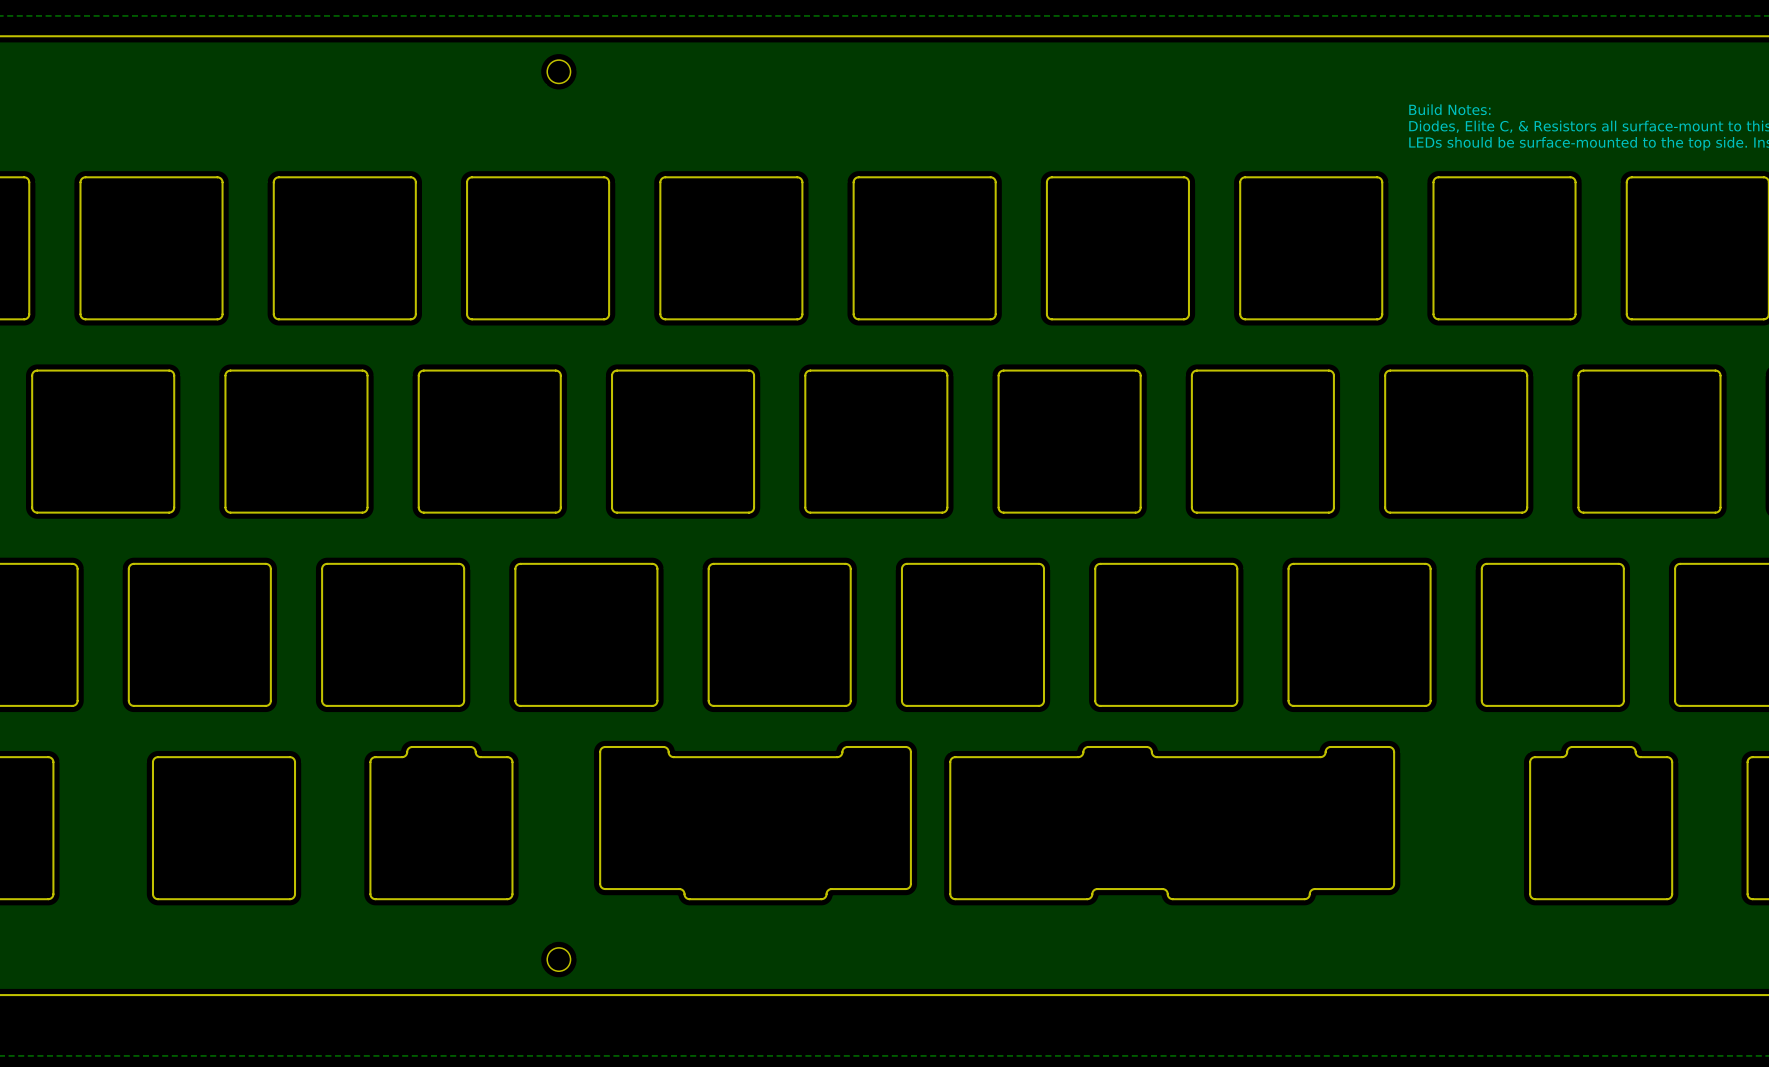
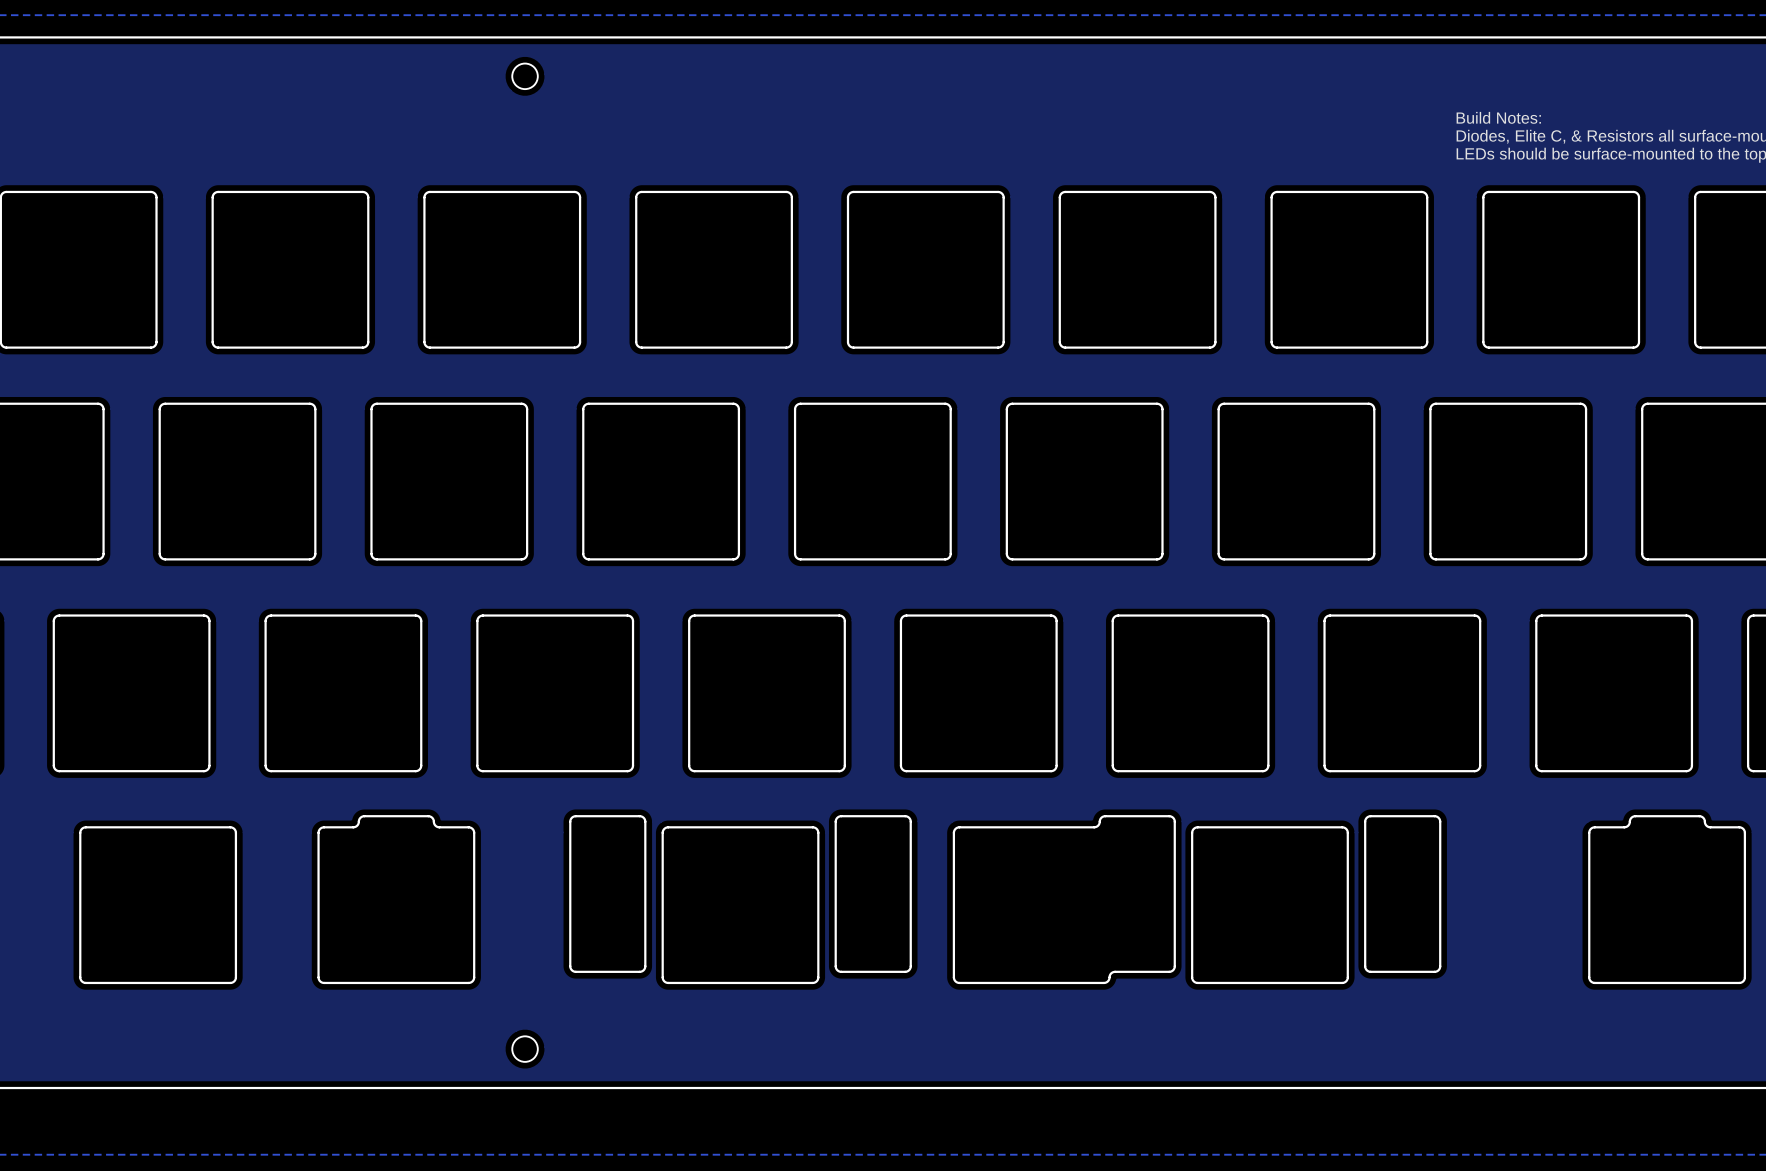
drawing shape: [369, 745, 1674, 901] -> [317, 815, 1747, 985]

